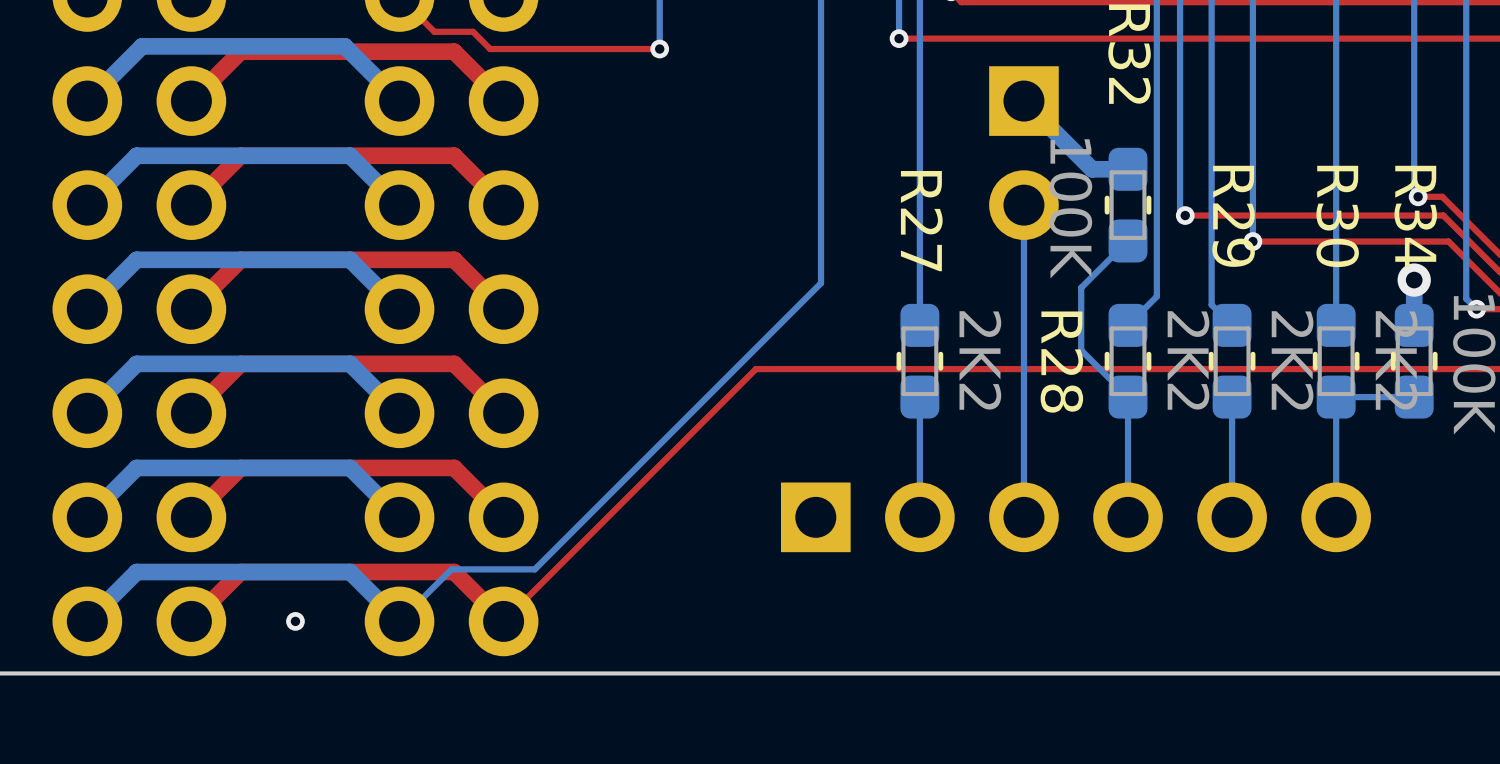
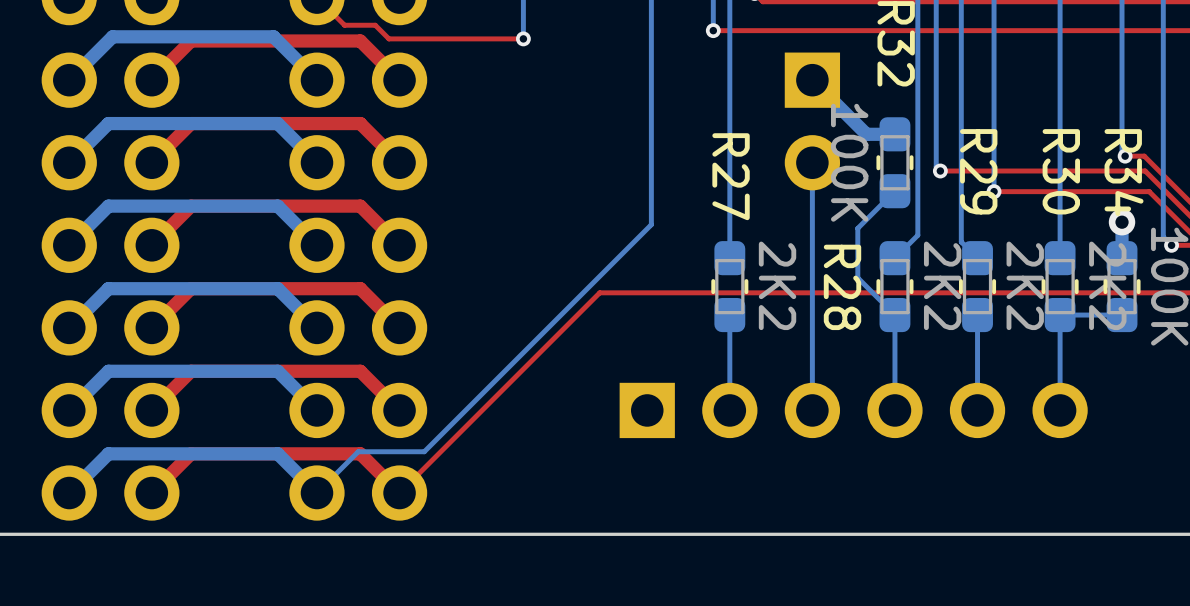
via: (295, 621) -> none

